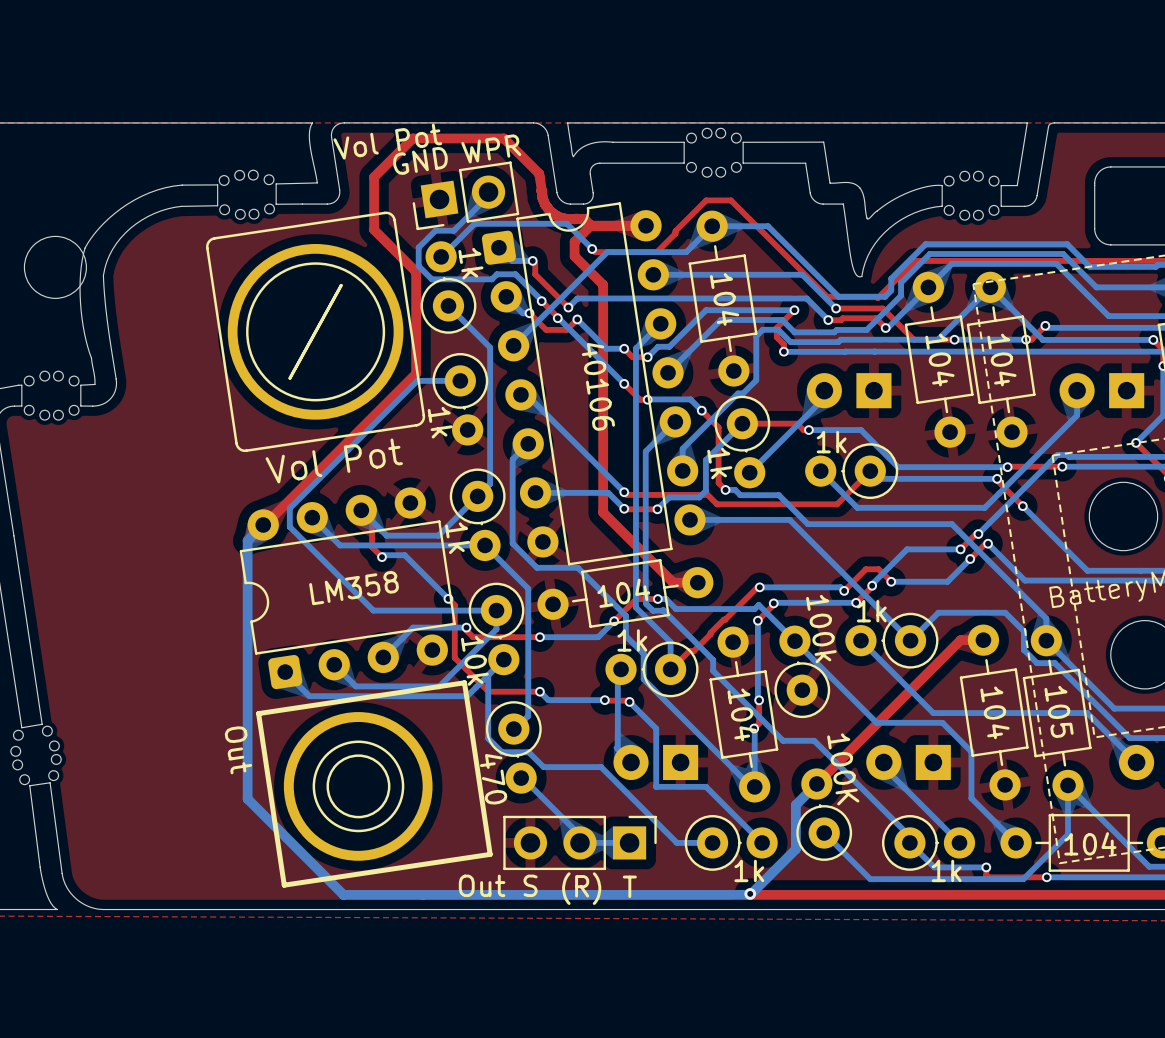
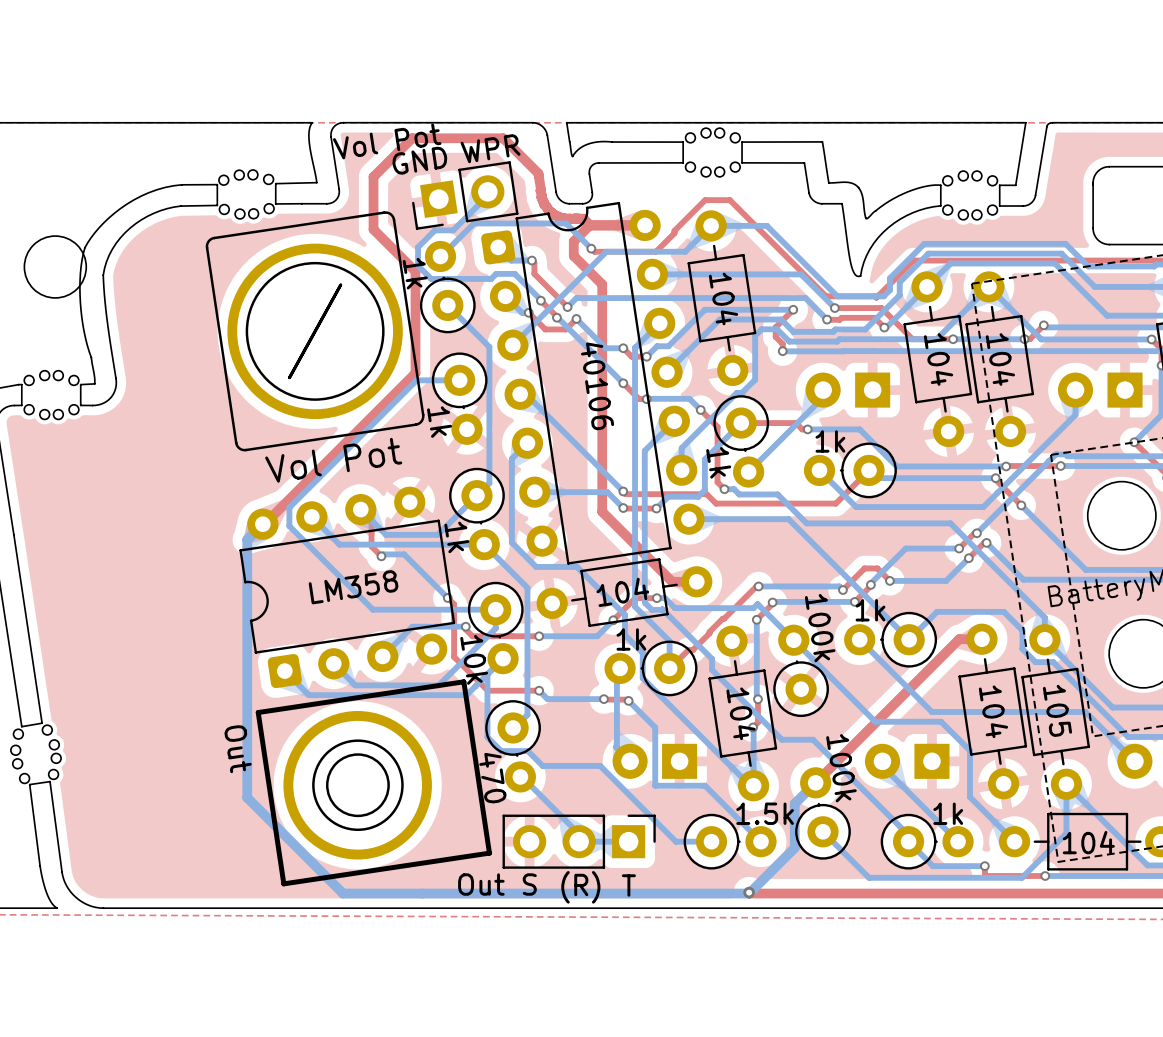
part value position: 1k (470, 263) -> 1k (415, 273)
part value: 100K (843, 769) -> 100k (841, 768)
part value: 1k (749, 870) -> 1.5k (765, 813)
part value position: 1k (946, 870) -> 1k (948, 813)

